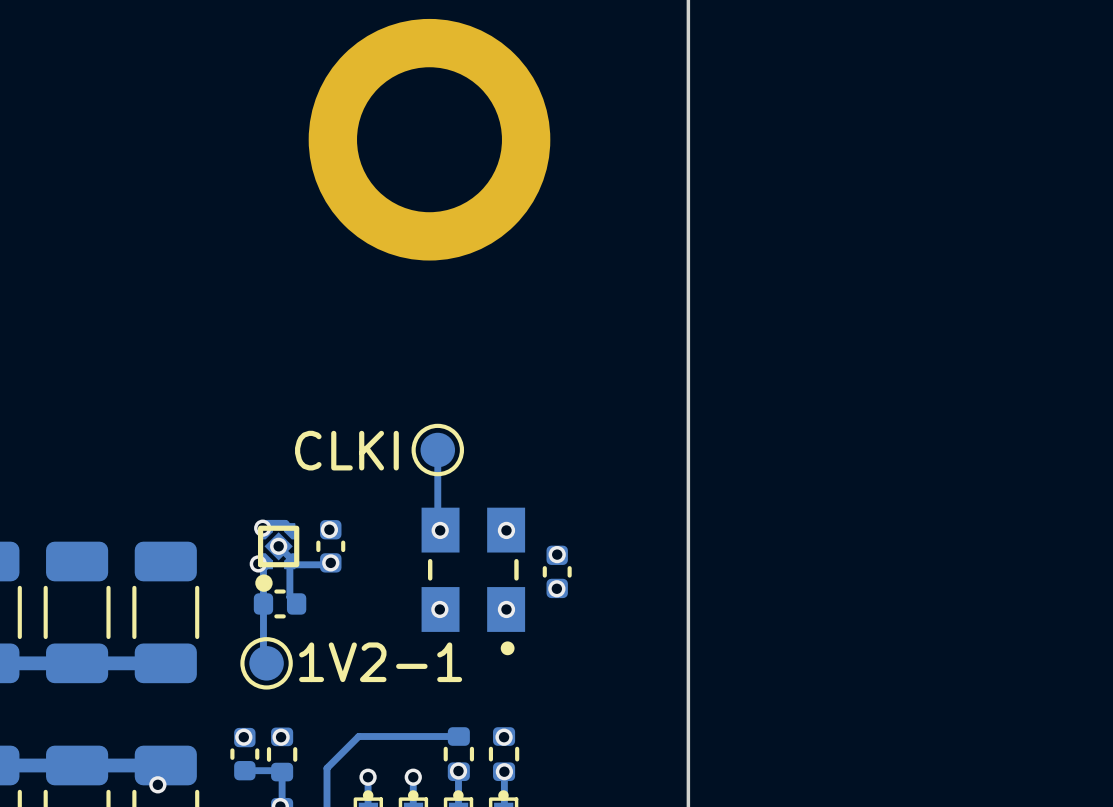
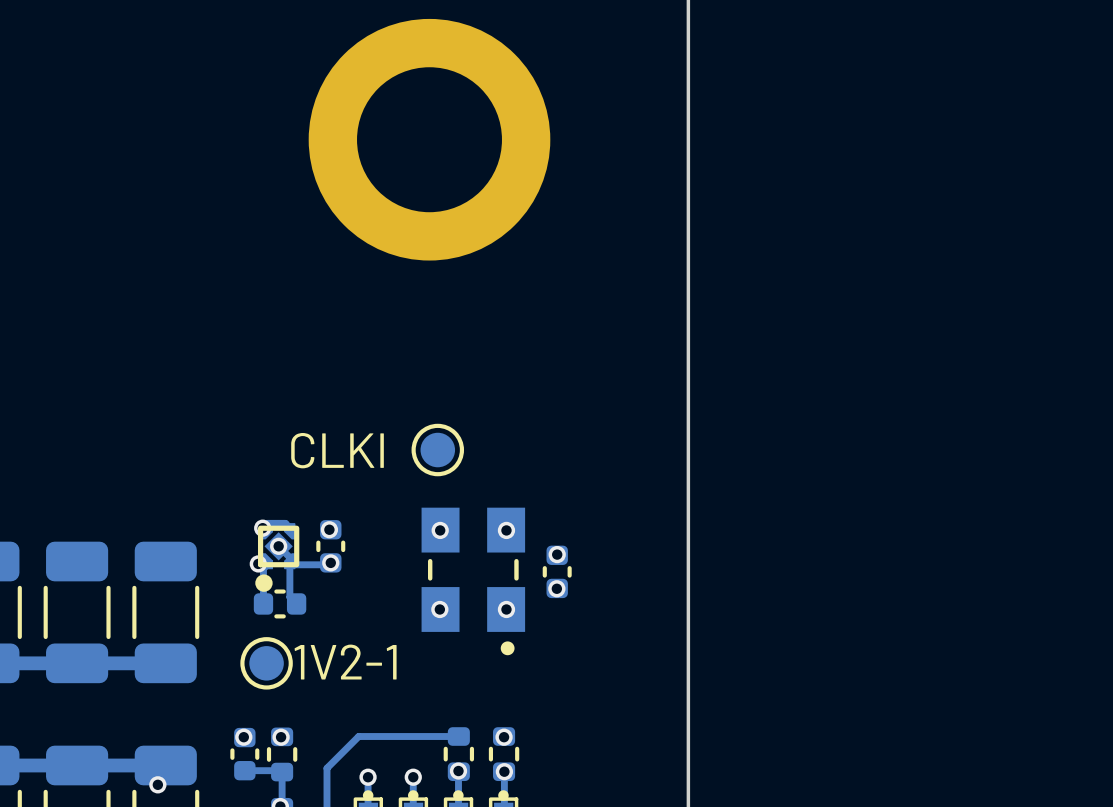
track: (437, 450) (437, 527) (440, 530) -> none
track: (263, 603) (263, 660) (266, 663) -> none

